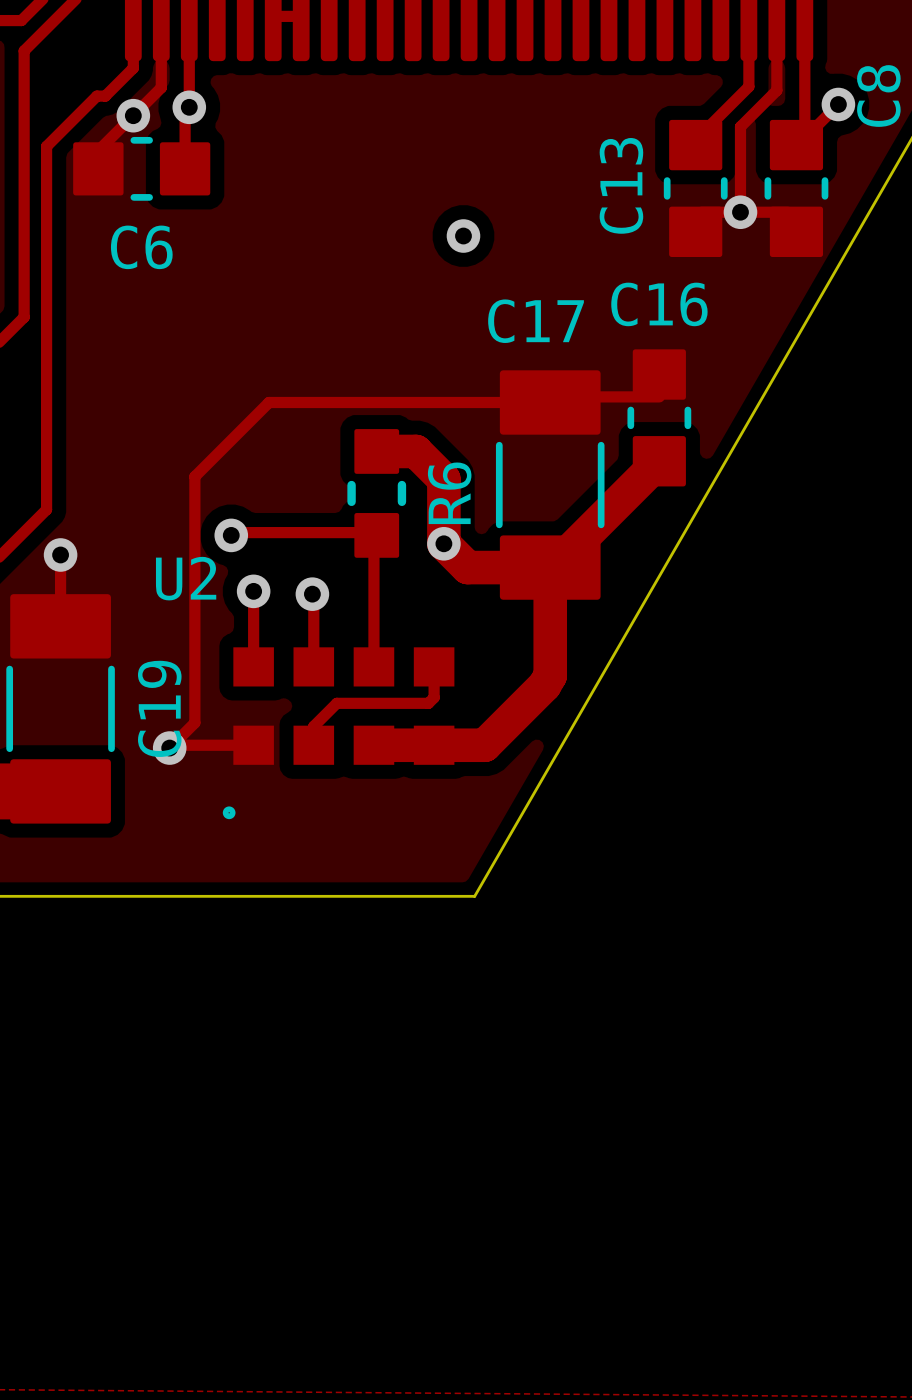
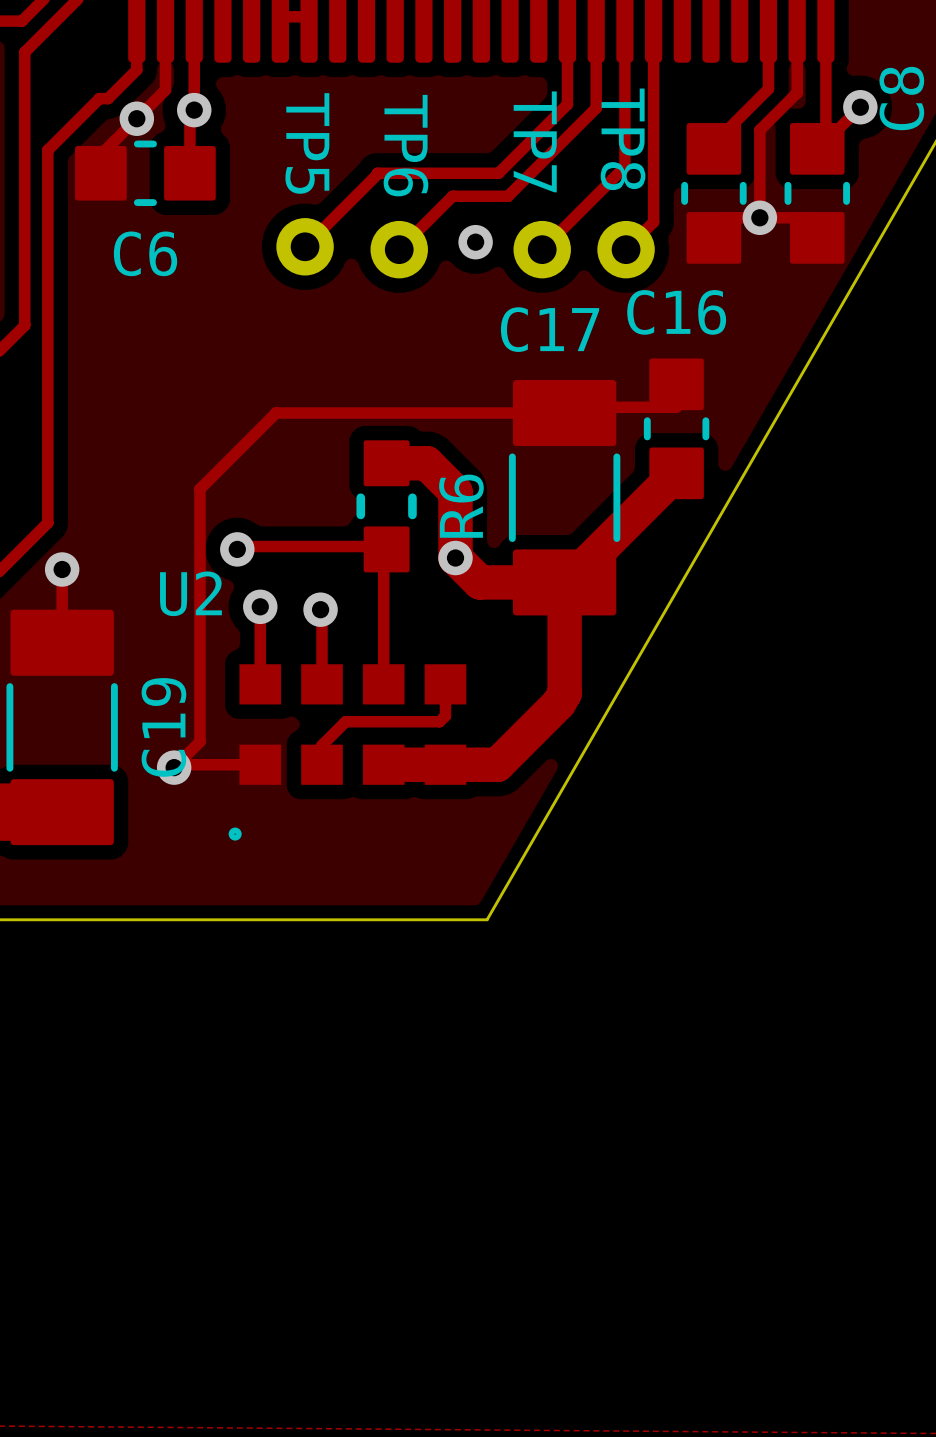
track: none -> (567, 16) (567, 104) (498, 173) (377, 173)
track: none -> (596, 16) (596, 108) (508, 196) (452, 196) (399, 249)
track: none -> (624, 16) (624, 166) (542, 249)
track: none -> (653, 16) (653, 222) (626, 249)
track: none -> (377, 174) (305, 246)
C13 name: C13 (621, 185) -> none
TP5: none -> (305, 246)
TP6: none -> (399, 249)
TP7: none -> (542, 249)
TP8: none -> (626, 249)

